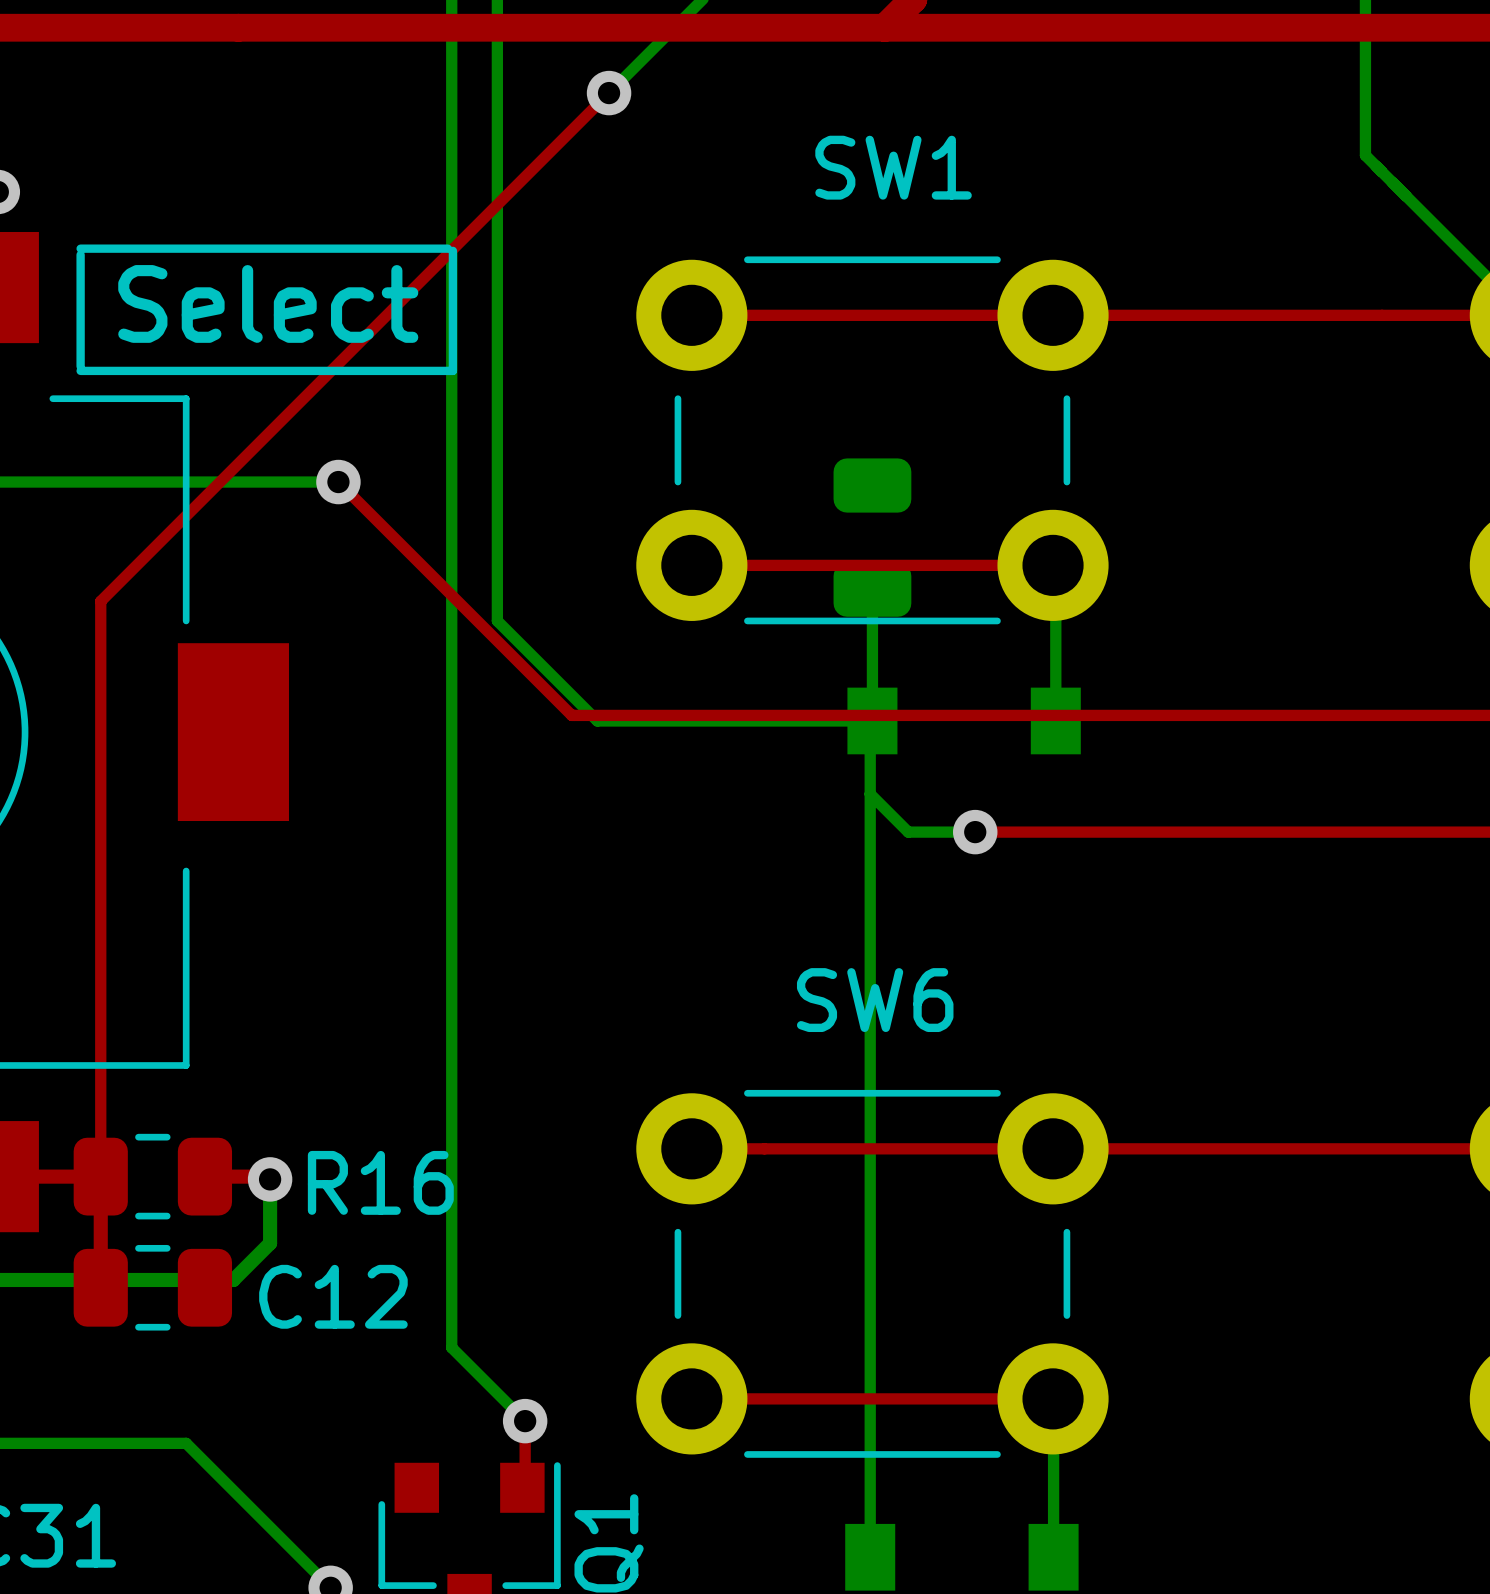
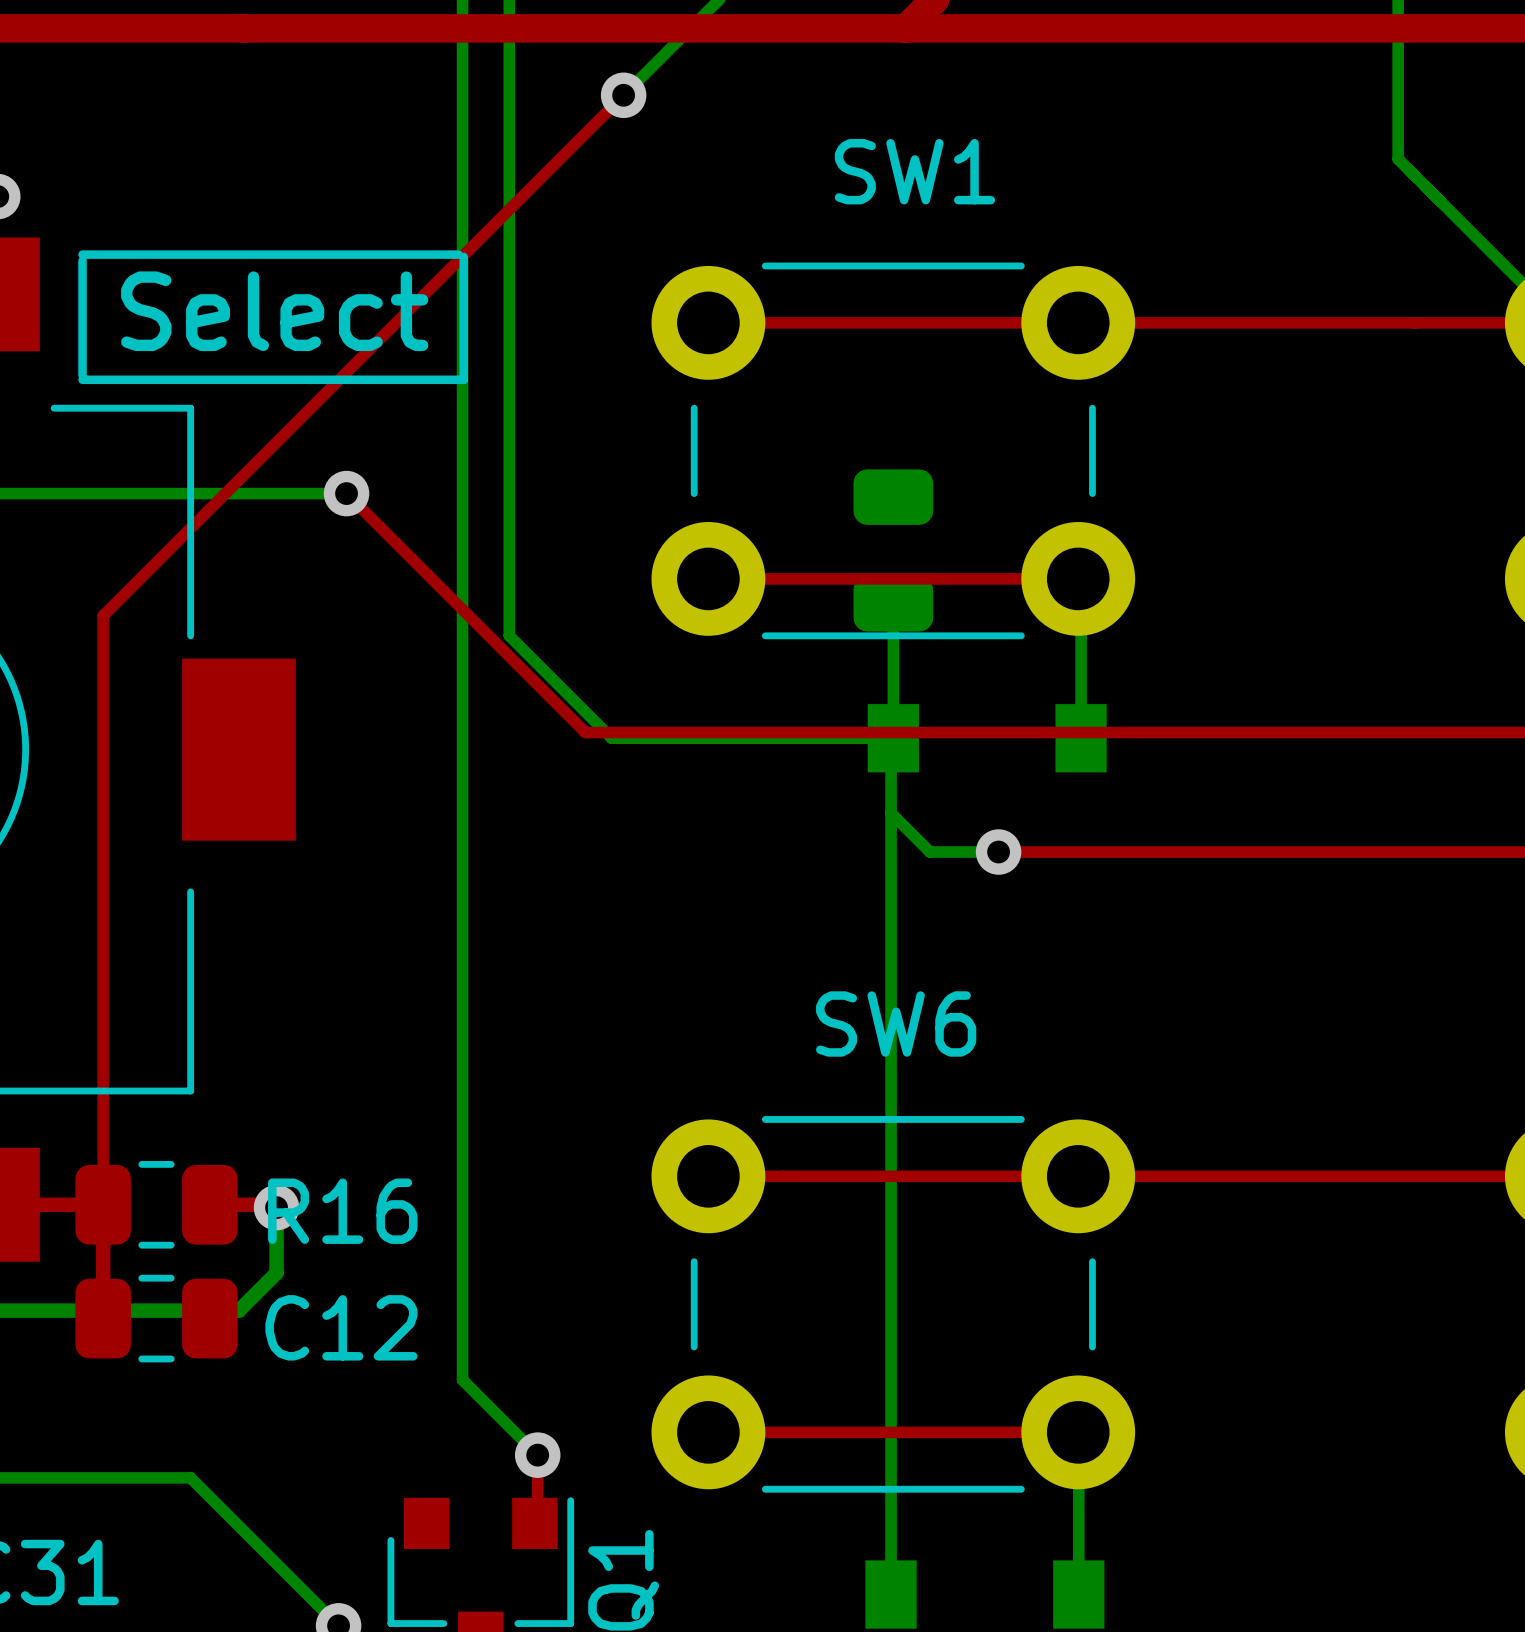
R16 name position: R16 (380, 1182) -> R16 (342, 1211)

